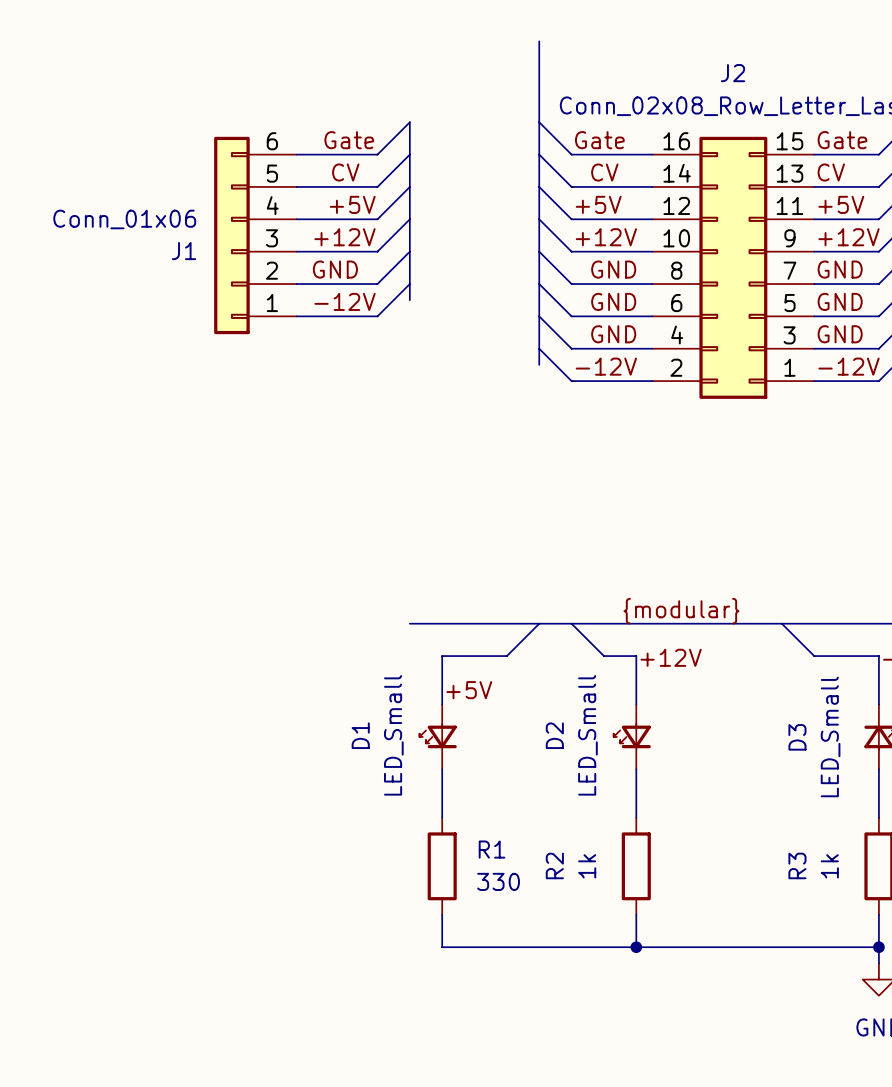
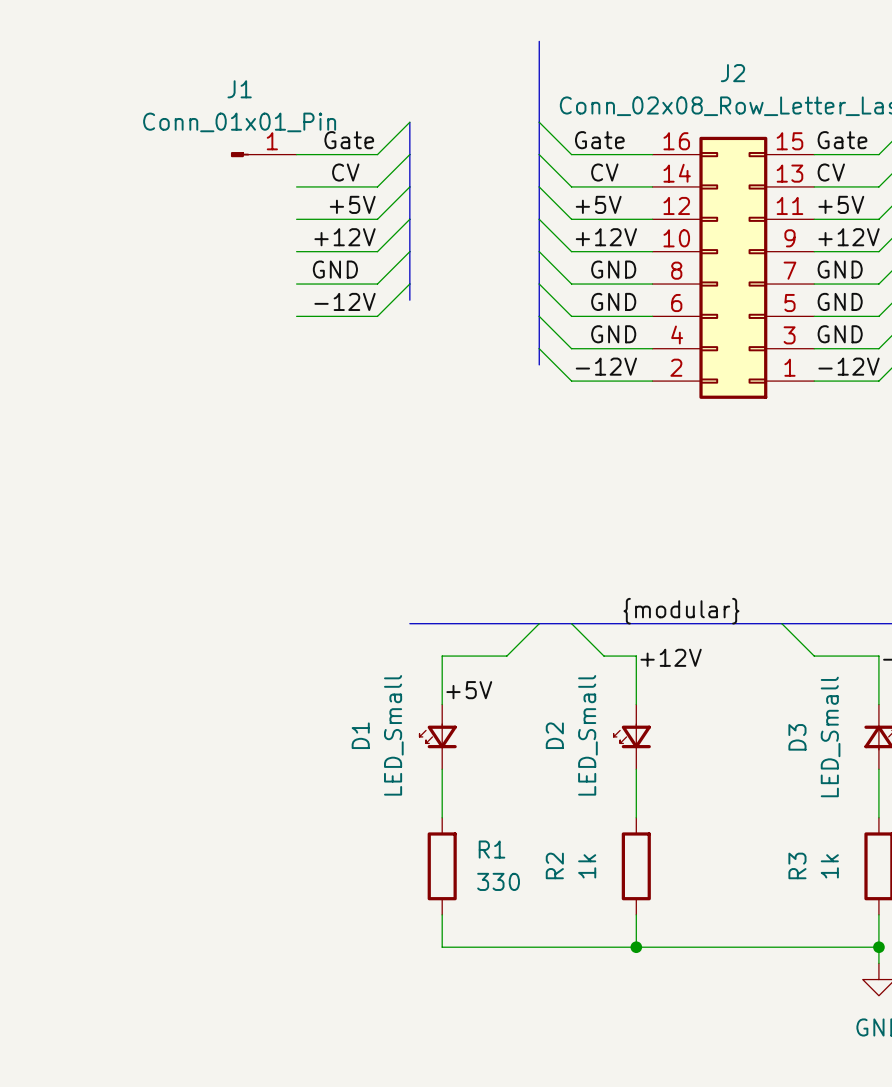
J1 symbol: [214, 136, 297, 335] -> [230, 152, 297, 158]
J1 value: Conn_01x06 (124, 219) -> Conn_01x01_Pin (239, 122)
J1 name position: J1 (184, 251) -> J1 (239, 89)

